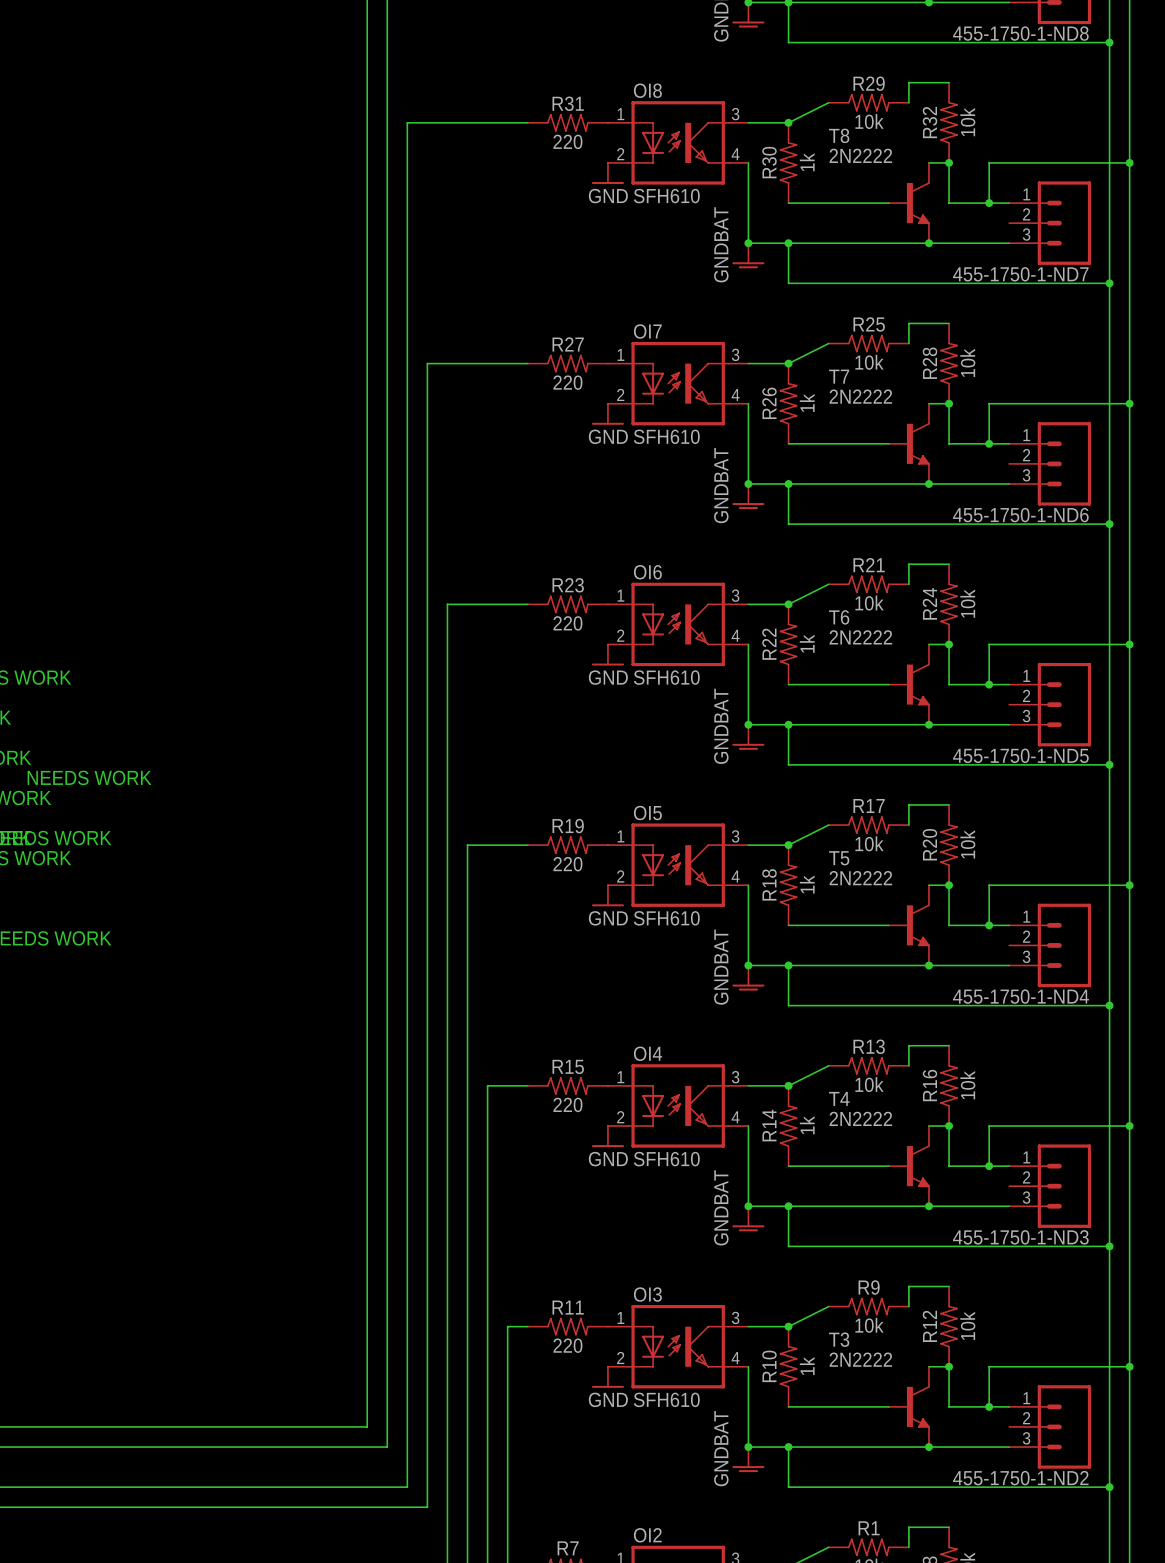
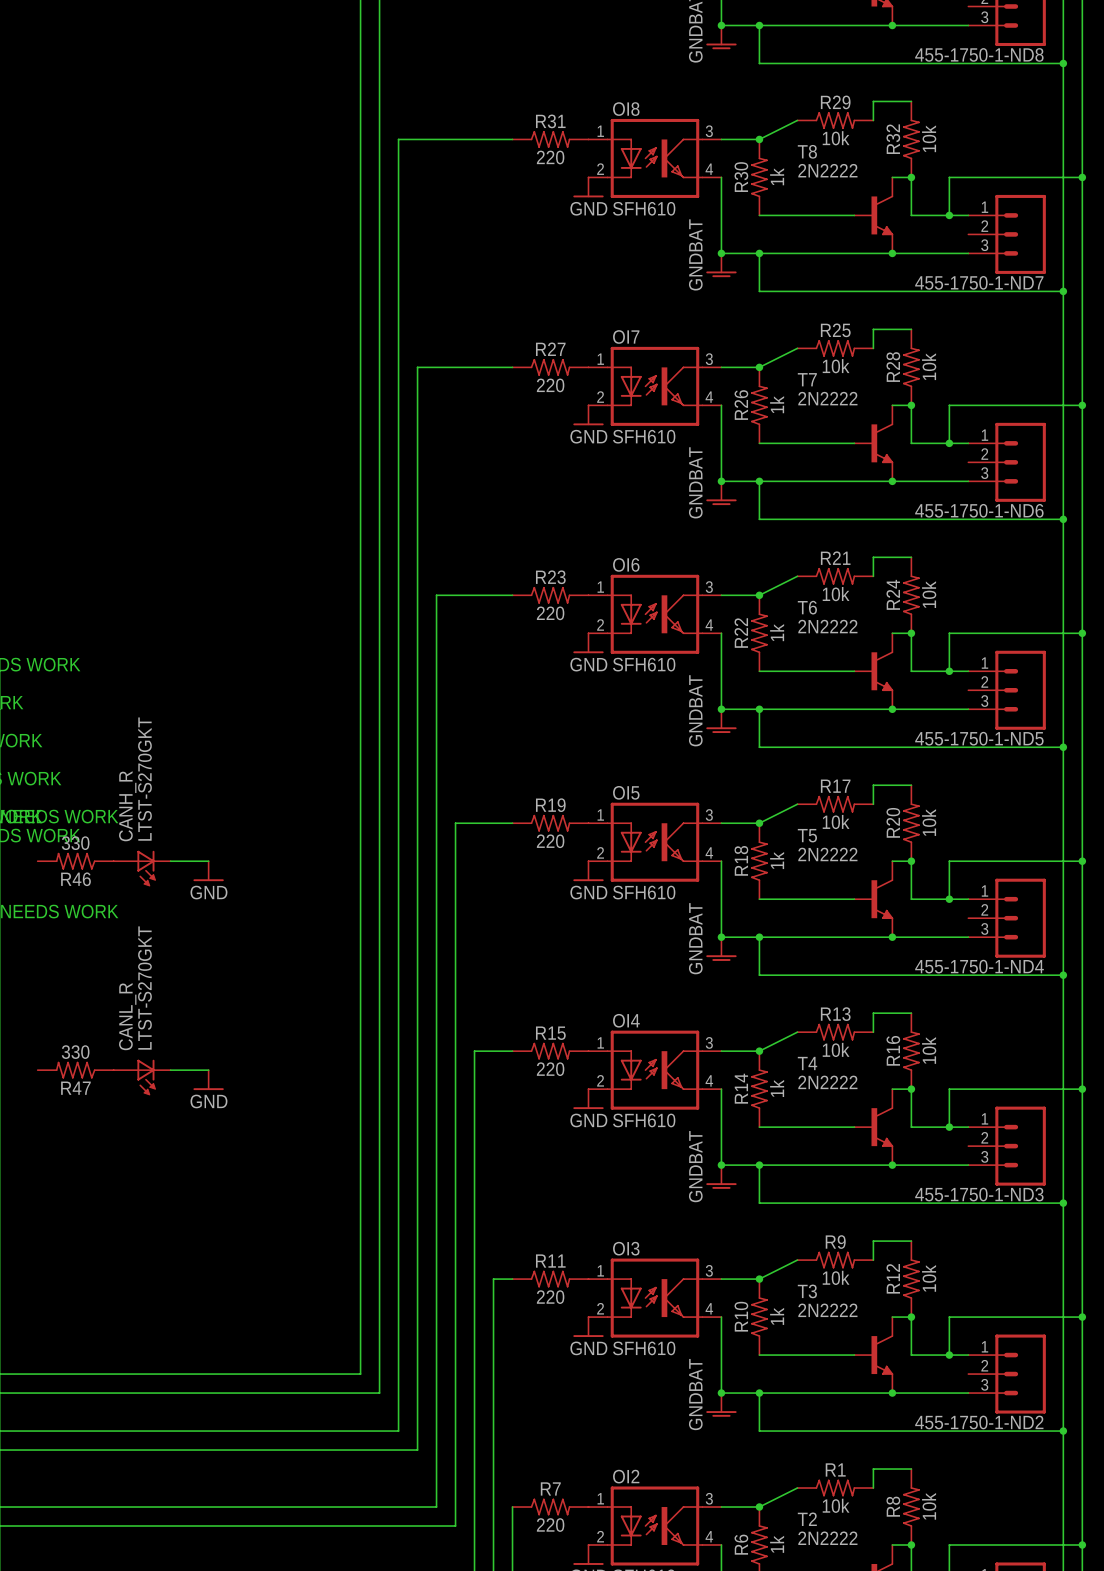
text: NEEDS WORK (89, 777) -> none
R46: none -> 330 (75, 861)
wire: none -> (170, 861) (208, 861)
CANH_R: none -> LTST-S270GKT (142, 868)
power symbol: none -> GND (208, 871)
R47: none -> 330 (75, 1070)
wire: none -> (170, 1070) (208, 1070)
CANL_R: none -> LTST-S270GKT (142, 1077)
power symbol: none -> GND (208, 1080)

